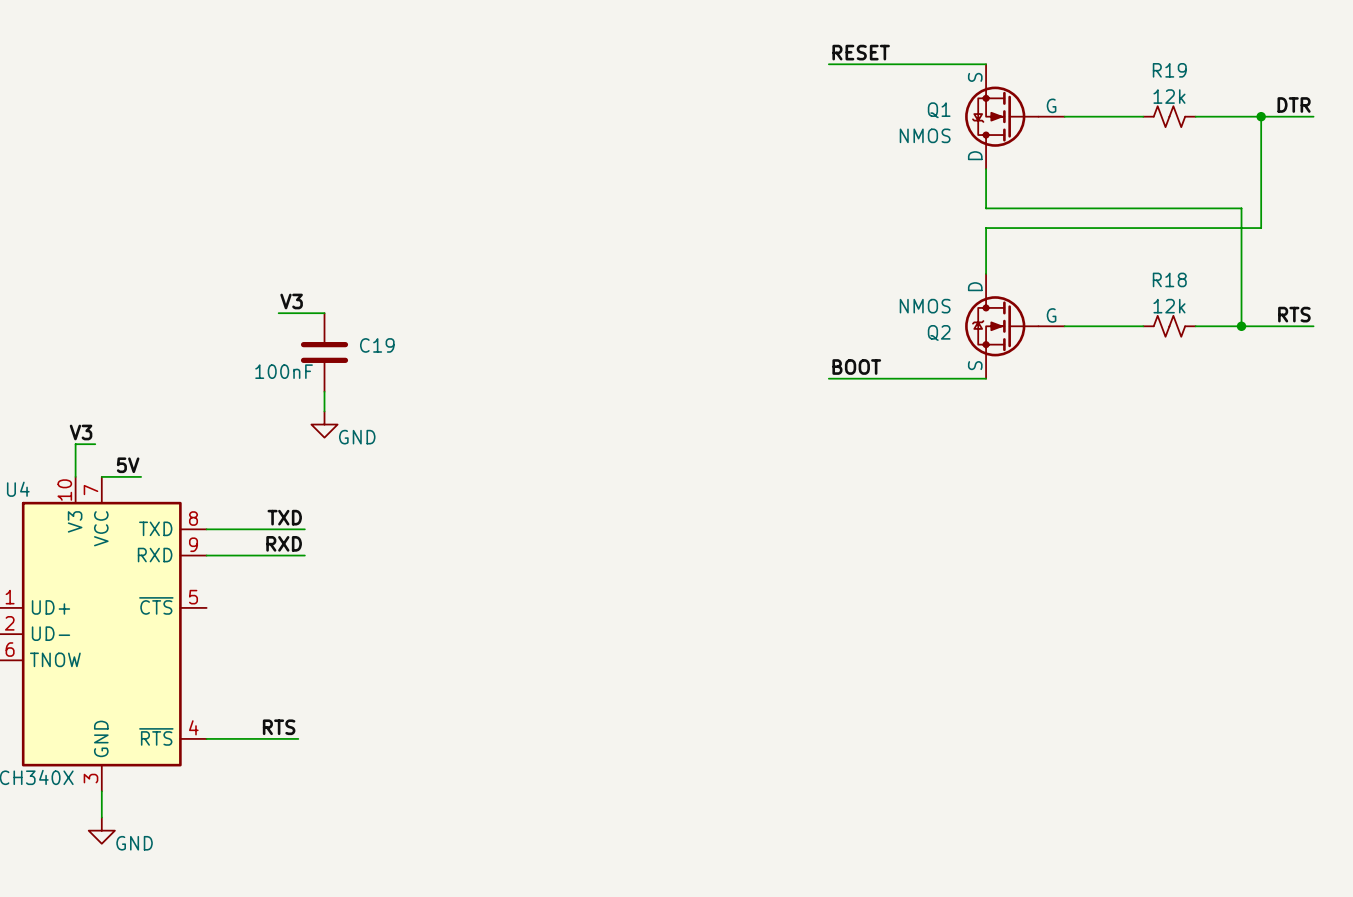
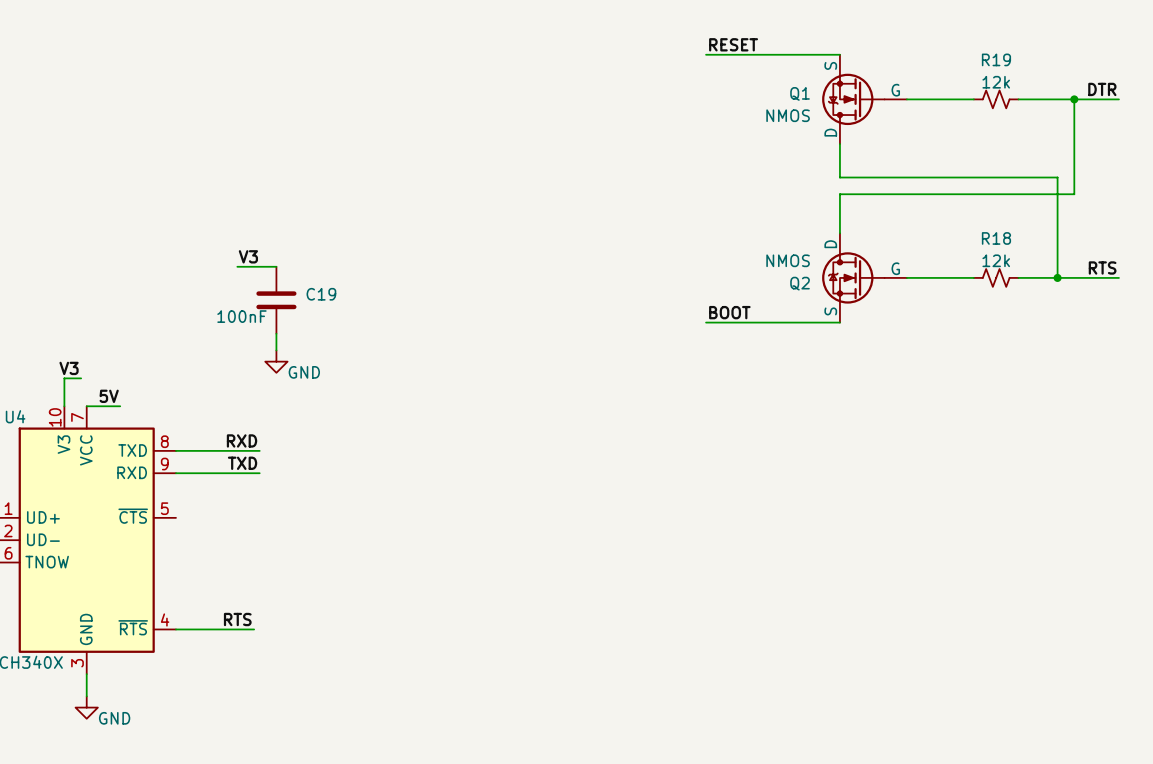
label: TXD (284, 517) -> RXD (242, 440)
label: RXD (284, 543) -> TXD (242, 463)

